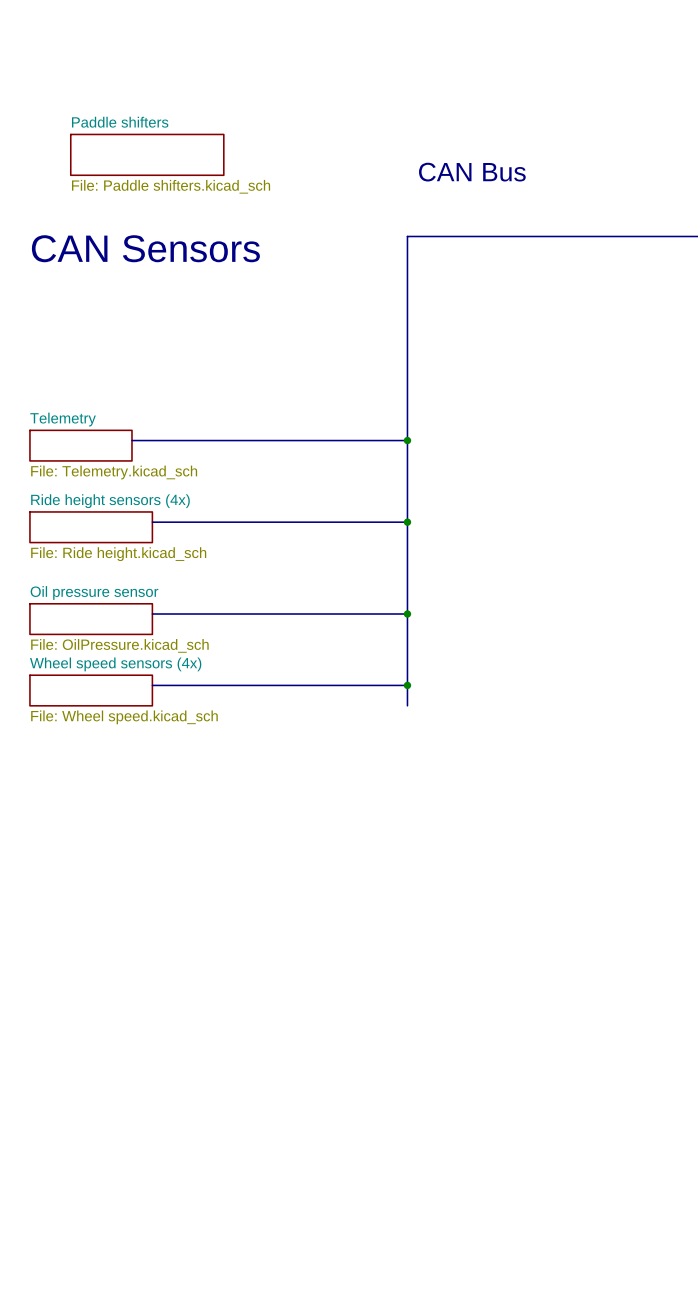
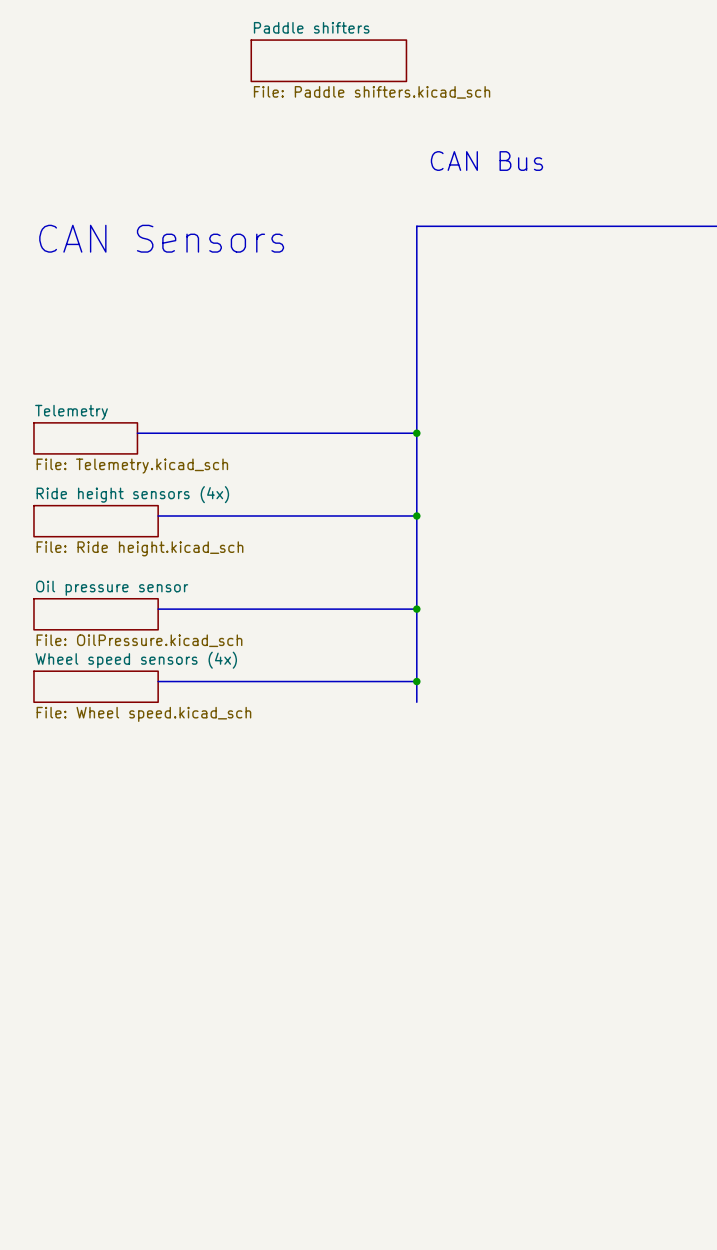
sheet Paddle shifters position: (147, 154) -> (328, 60)

